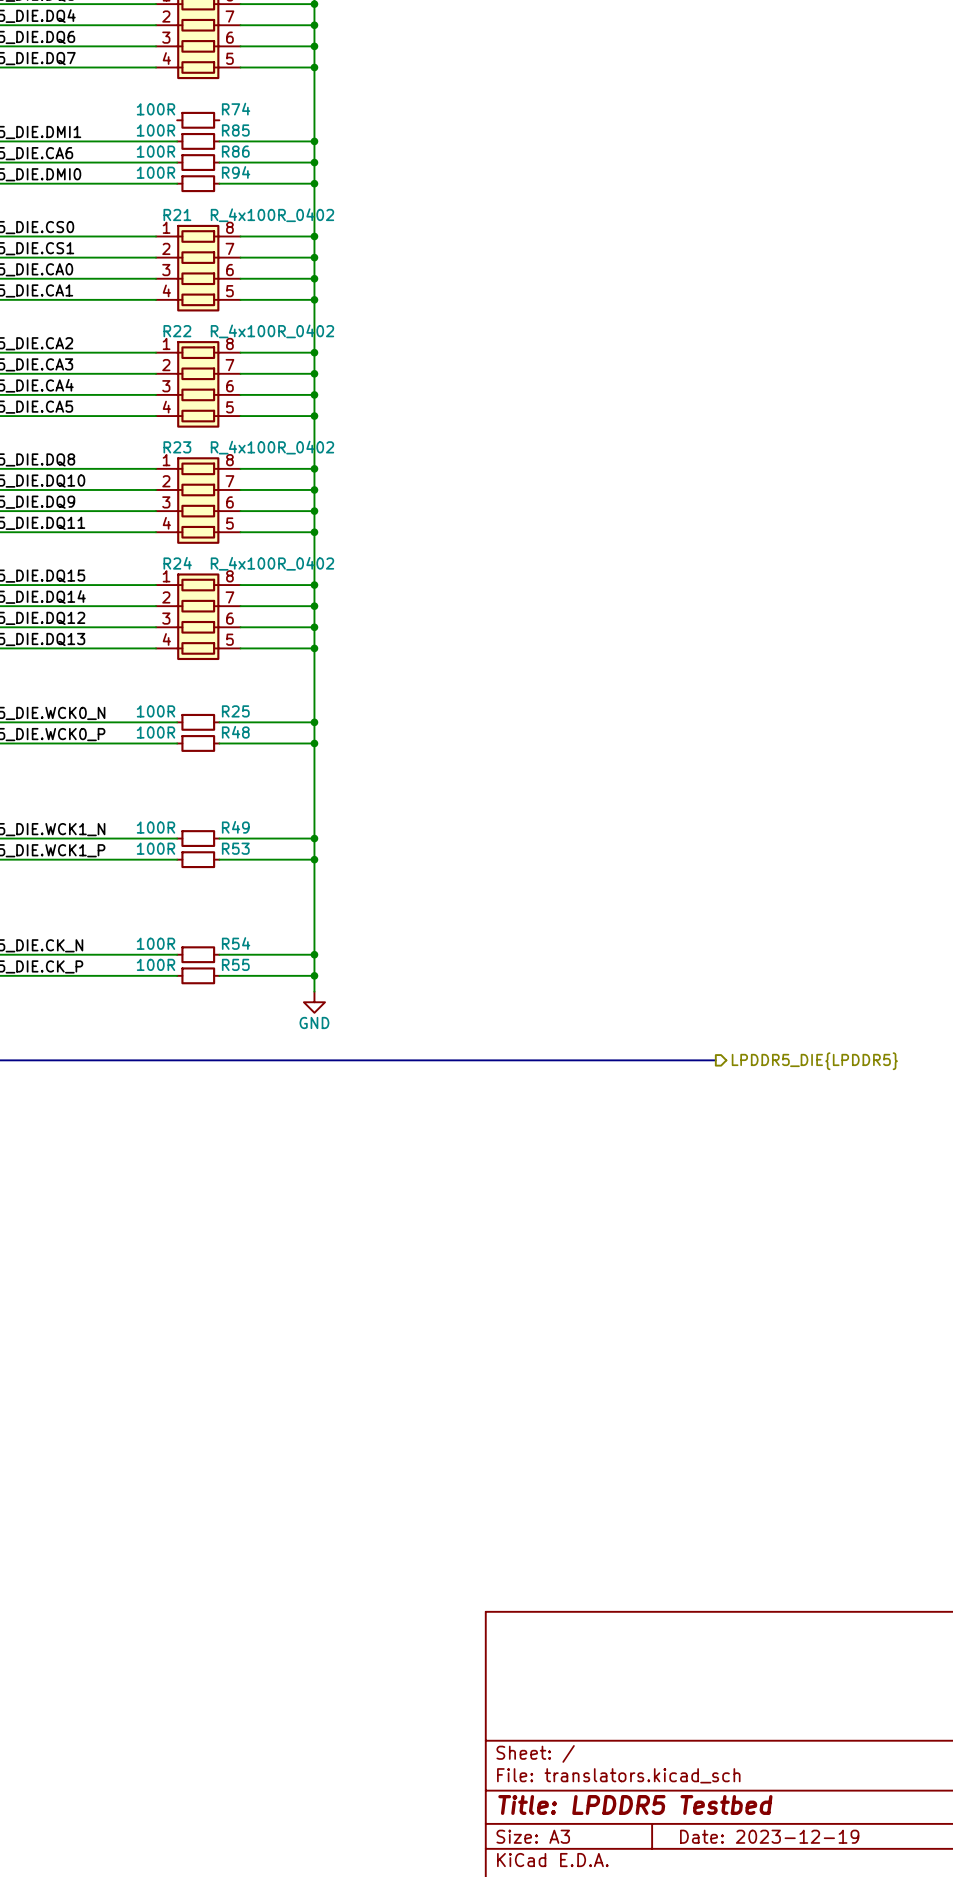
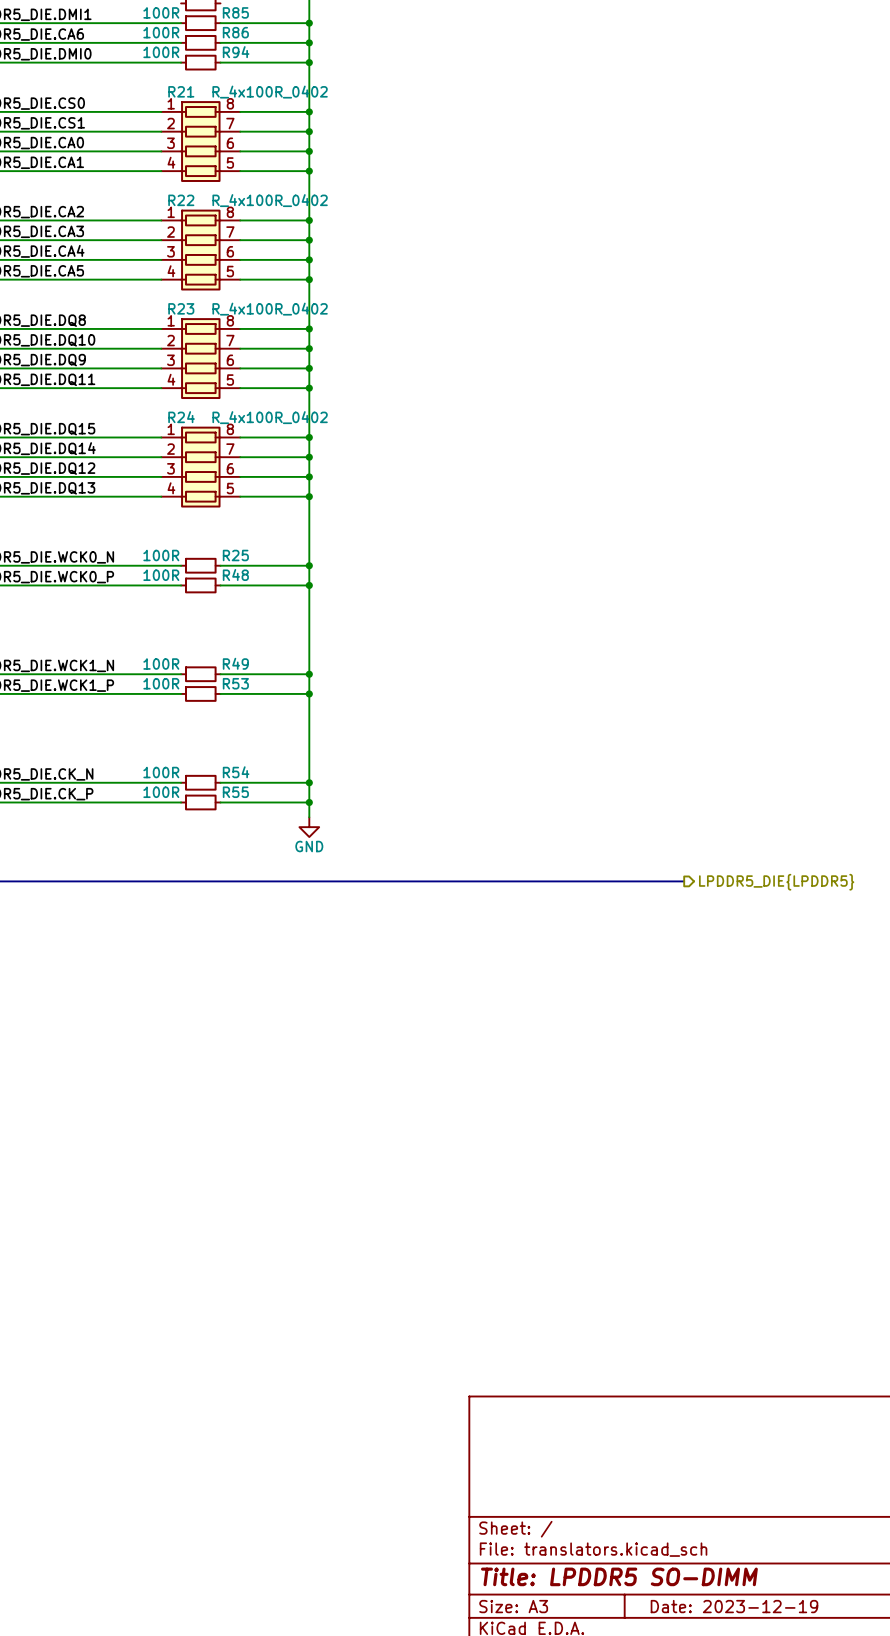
title block: Title: LPDDR5 Testbed (635, 1804) -> Title: LPDDR5 SO-DIMM (619, 1576)

